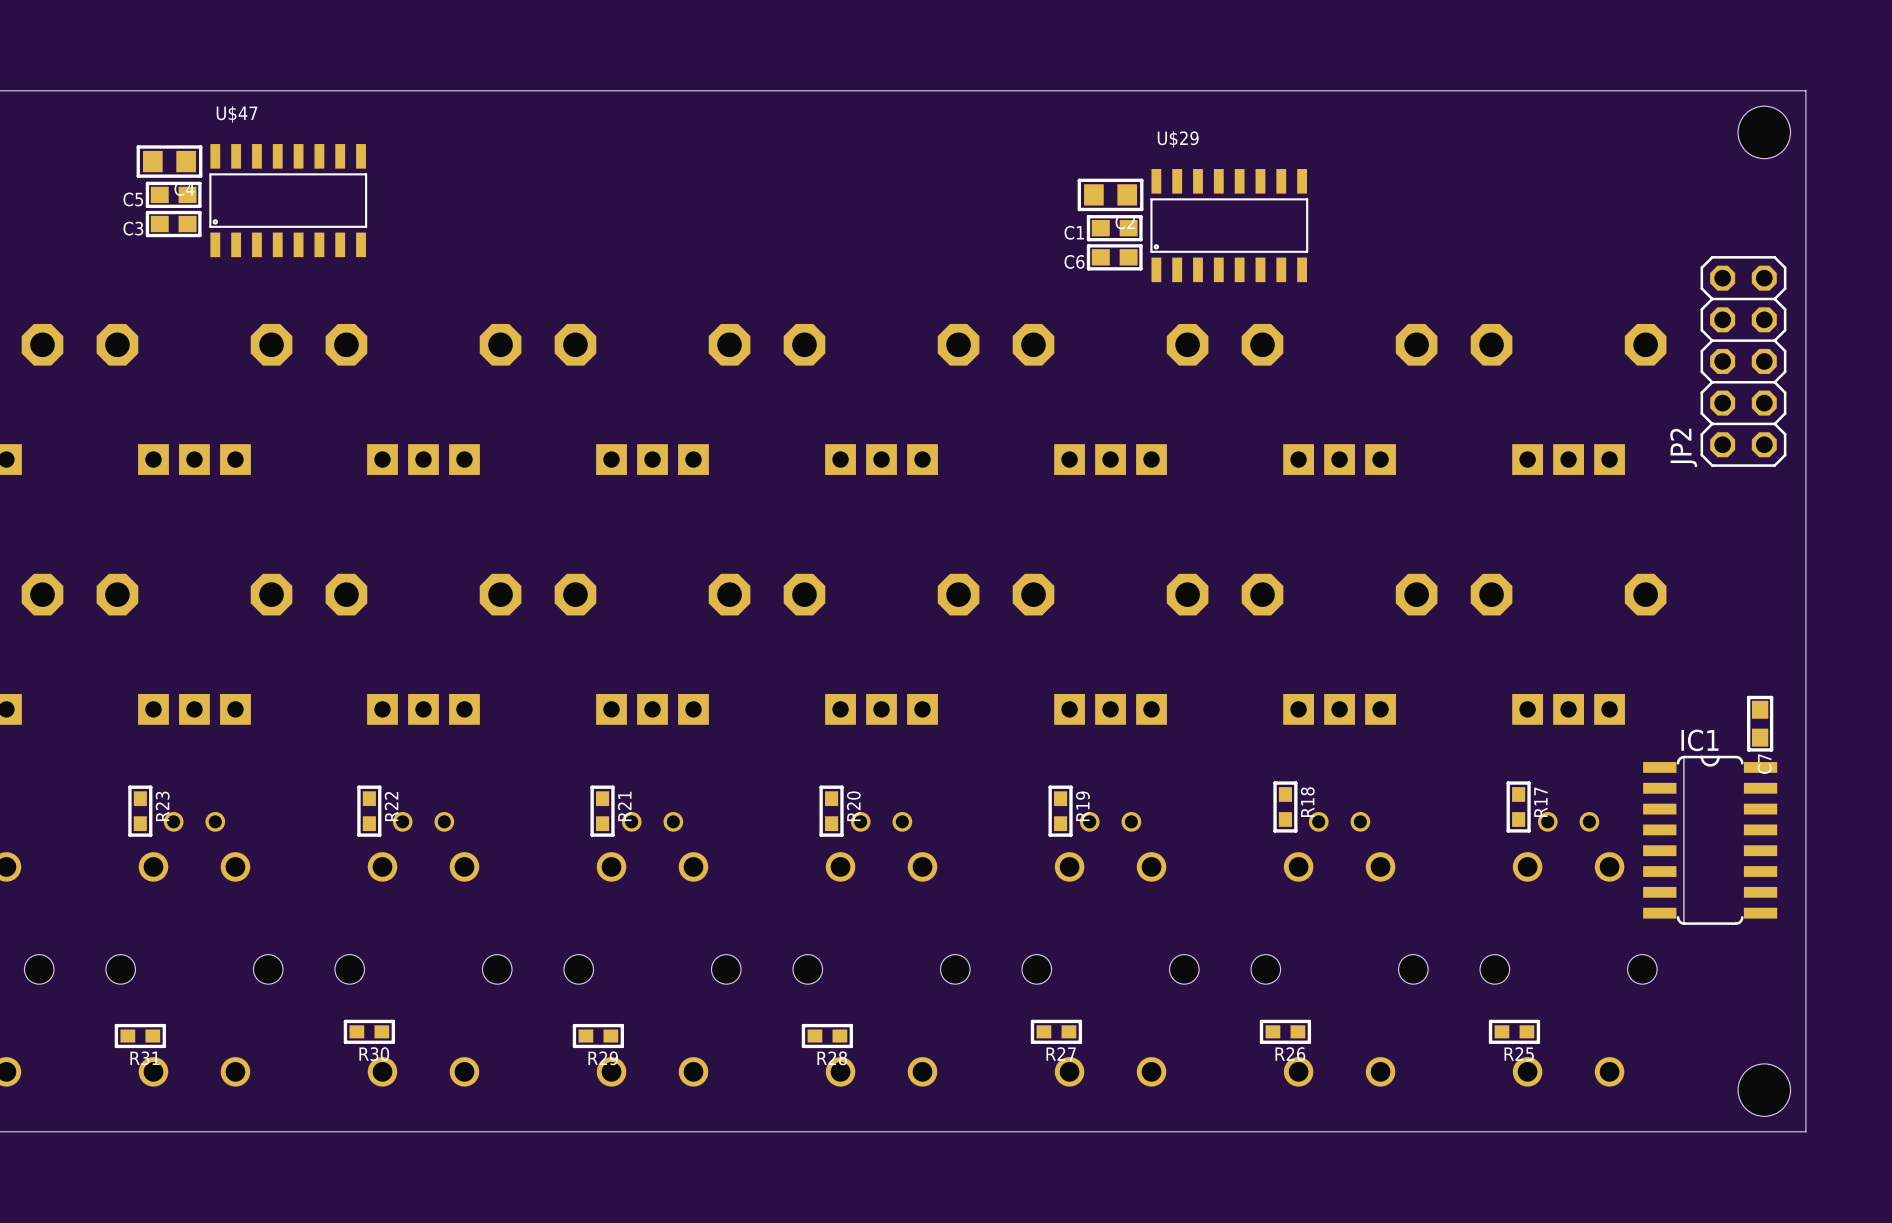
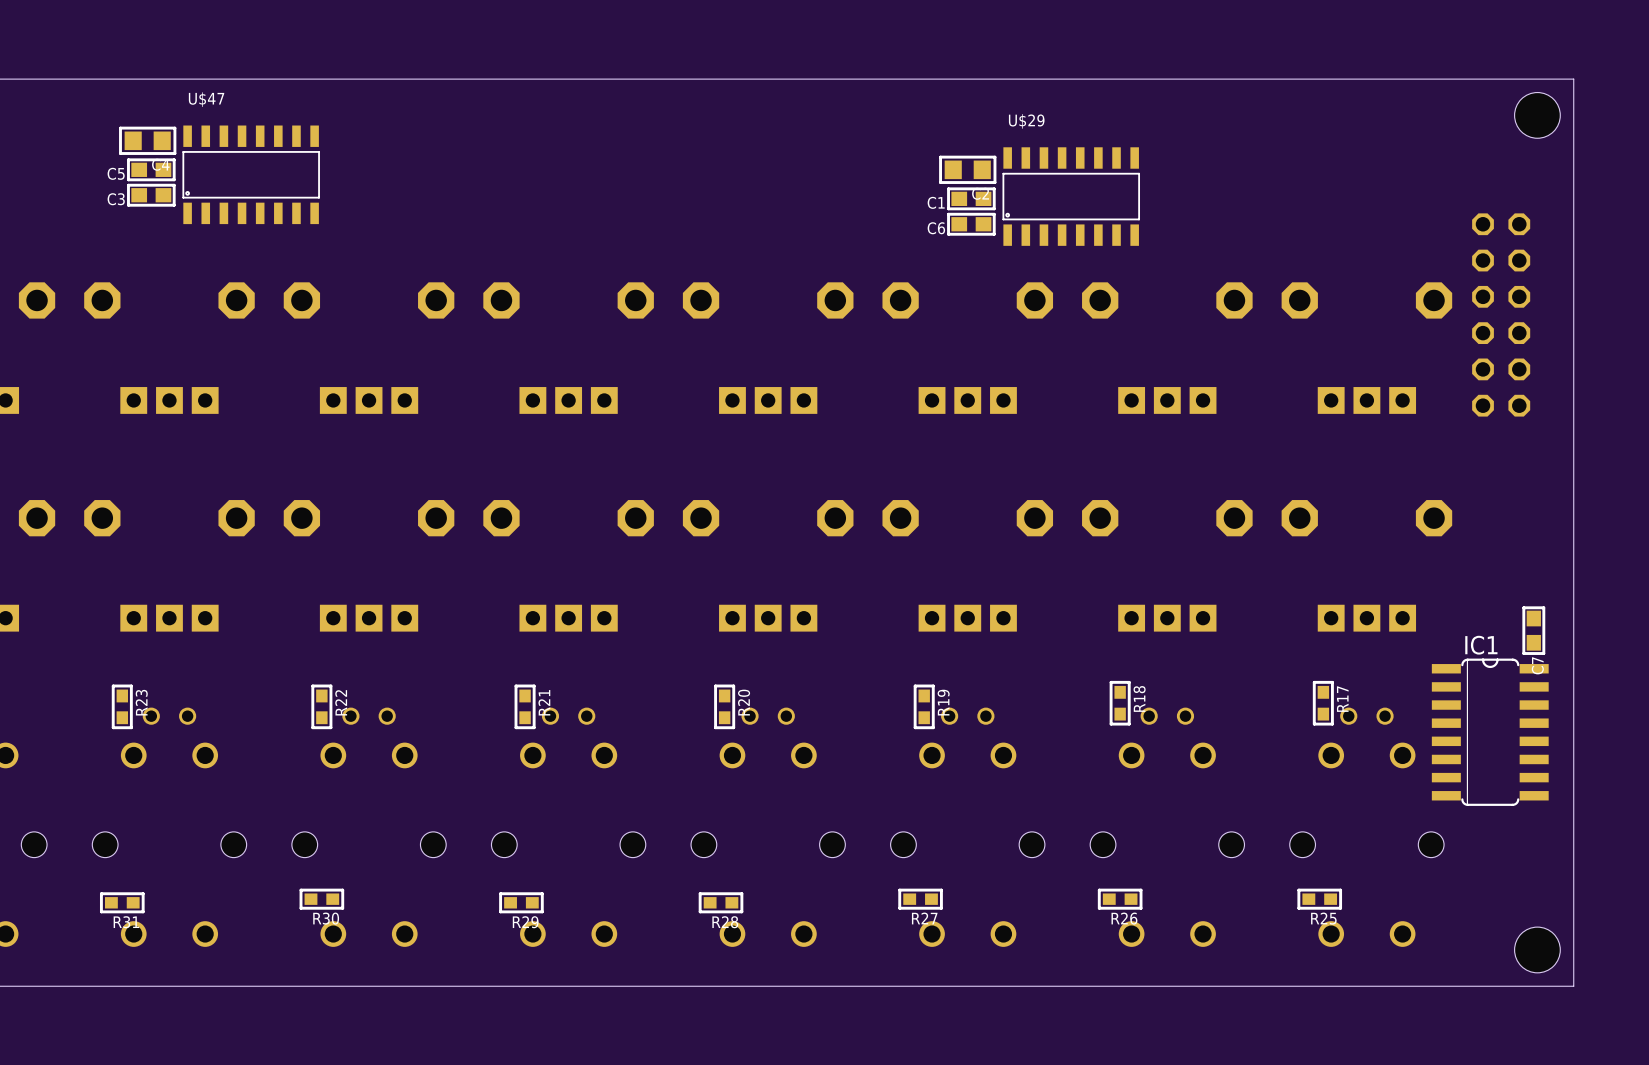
part: none -> (1501, 314)
JP2: (1743, 361) -> none

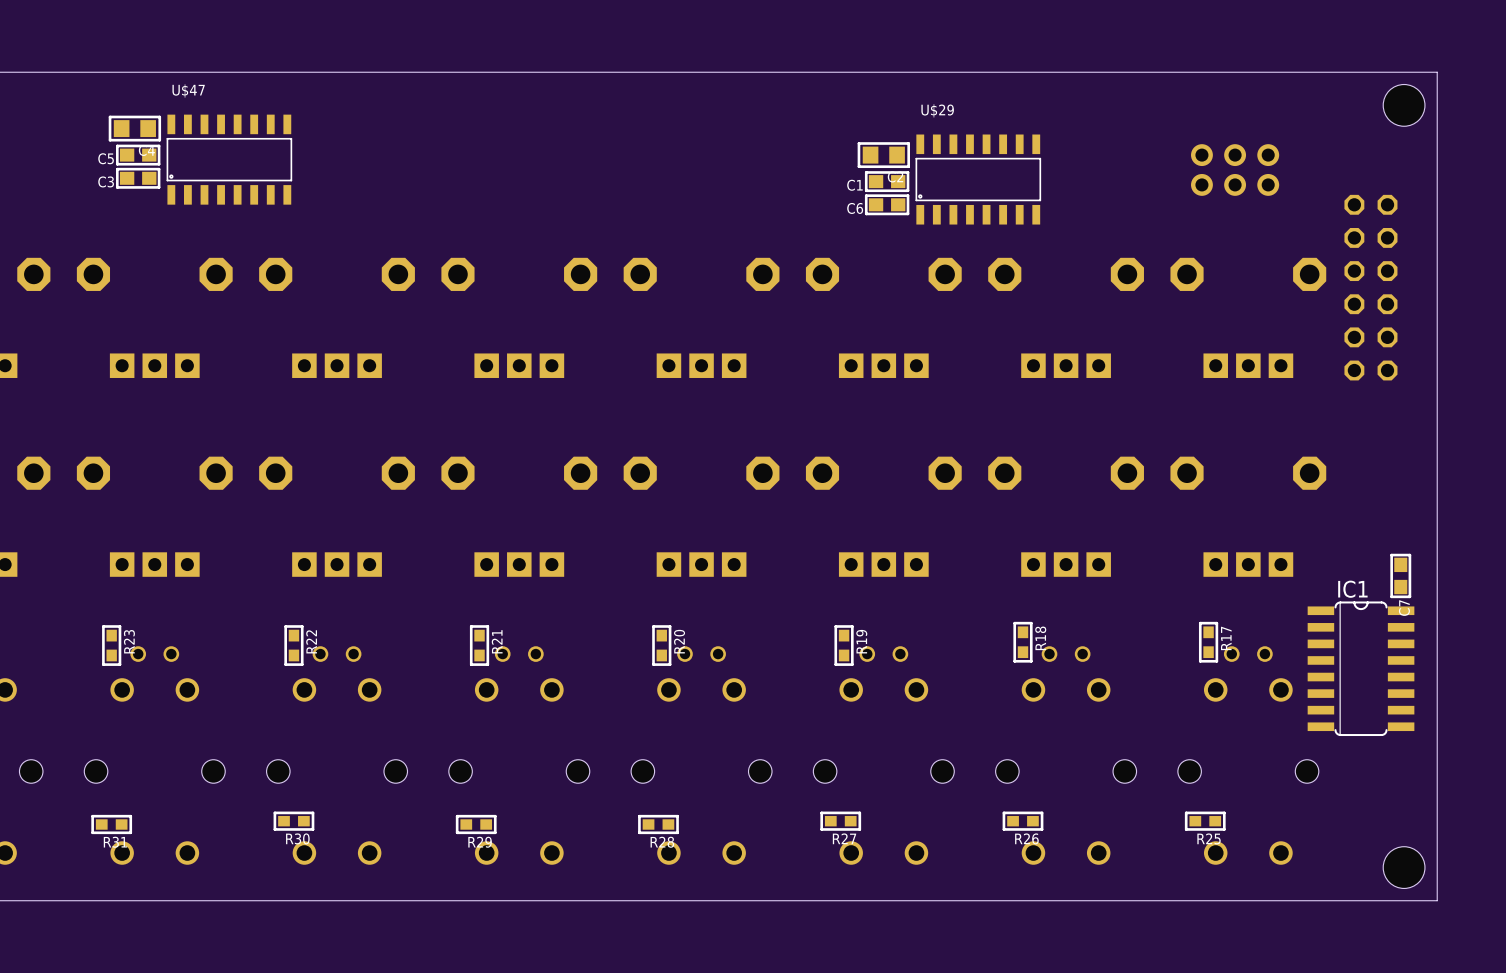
part: none -> (1235, 155)
part: none -> (1235, 184)

